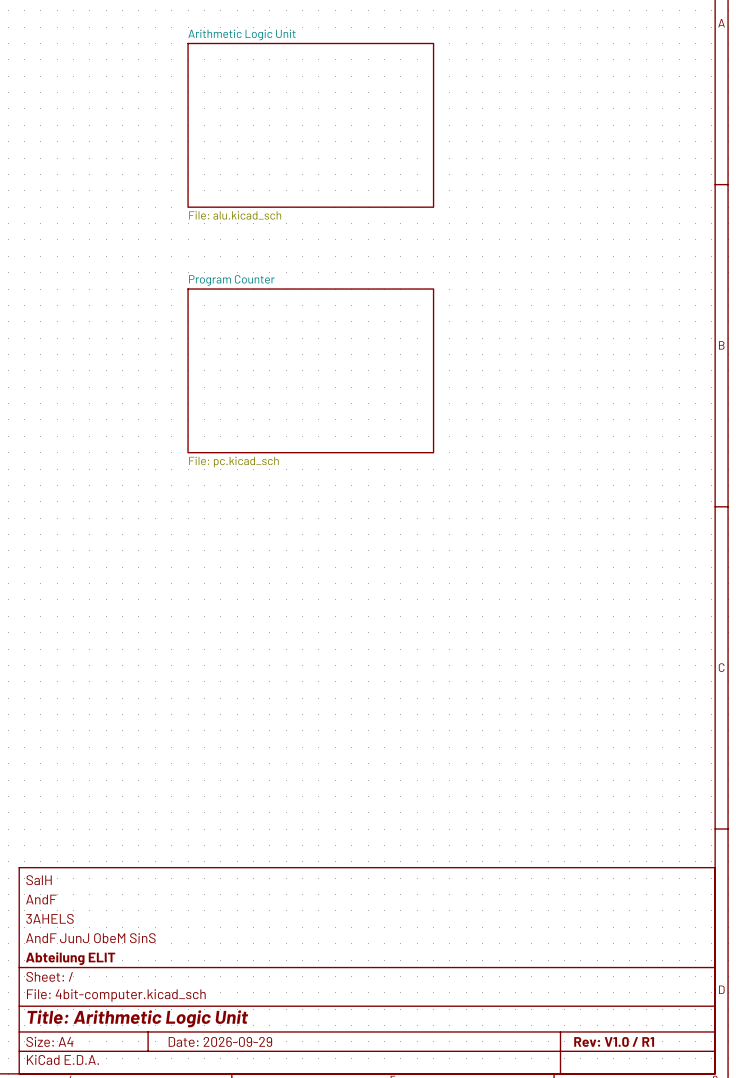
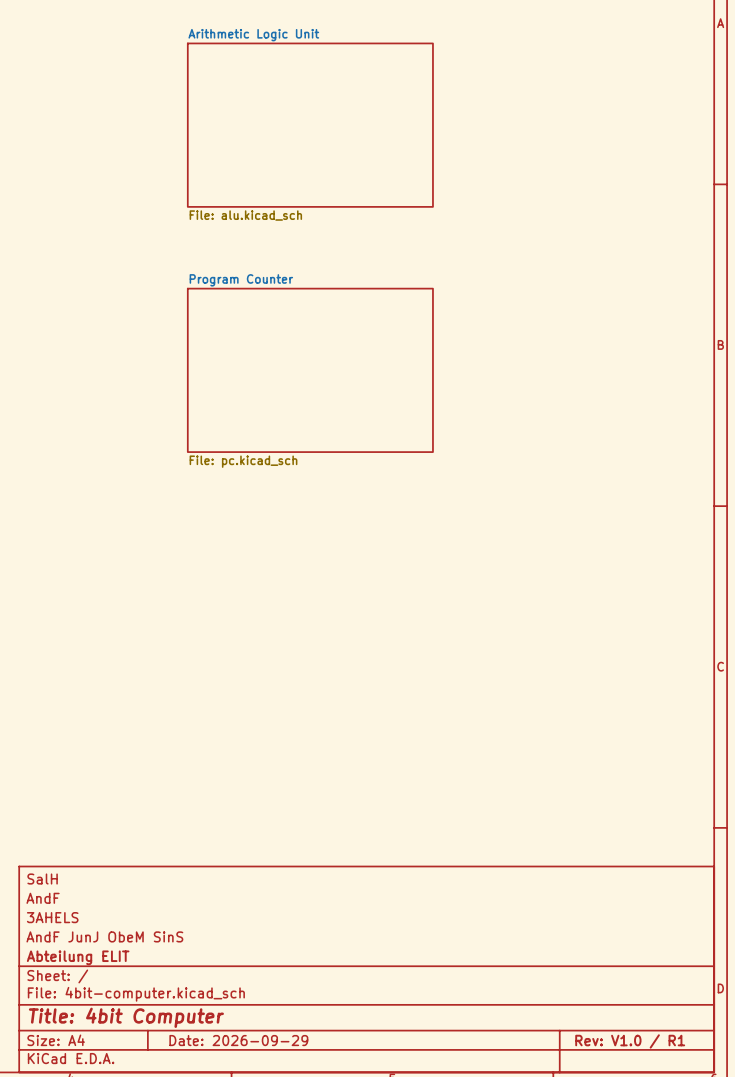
title block: Title: Arithmetic Logic Unit (137, 1018) -> Title: 4bit Computer (126, 1017)

